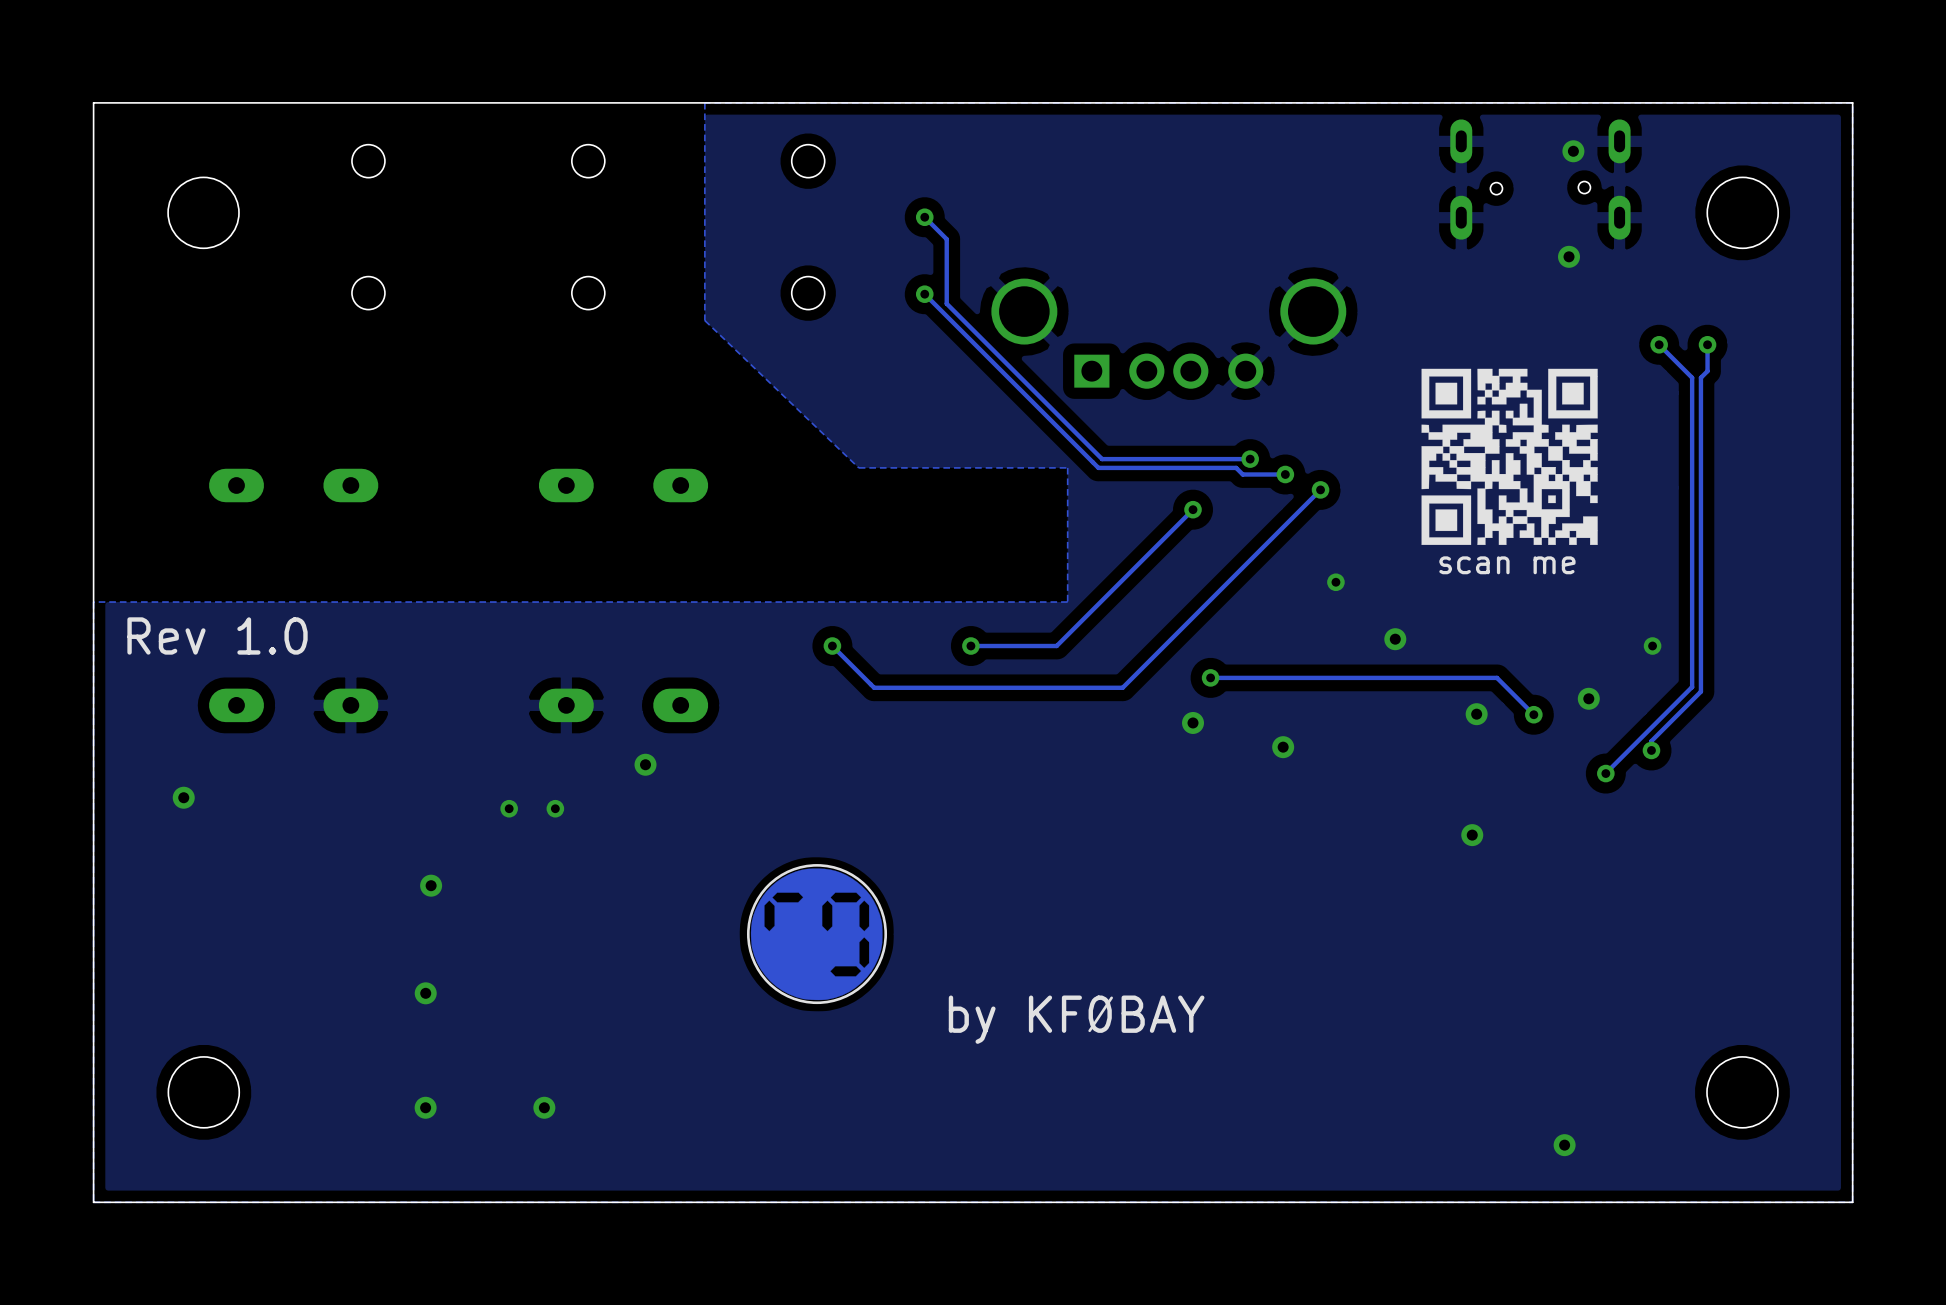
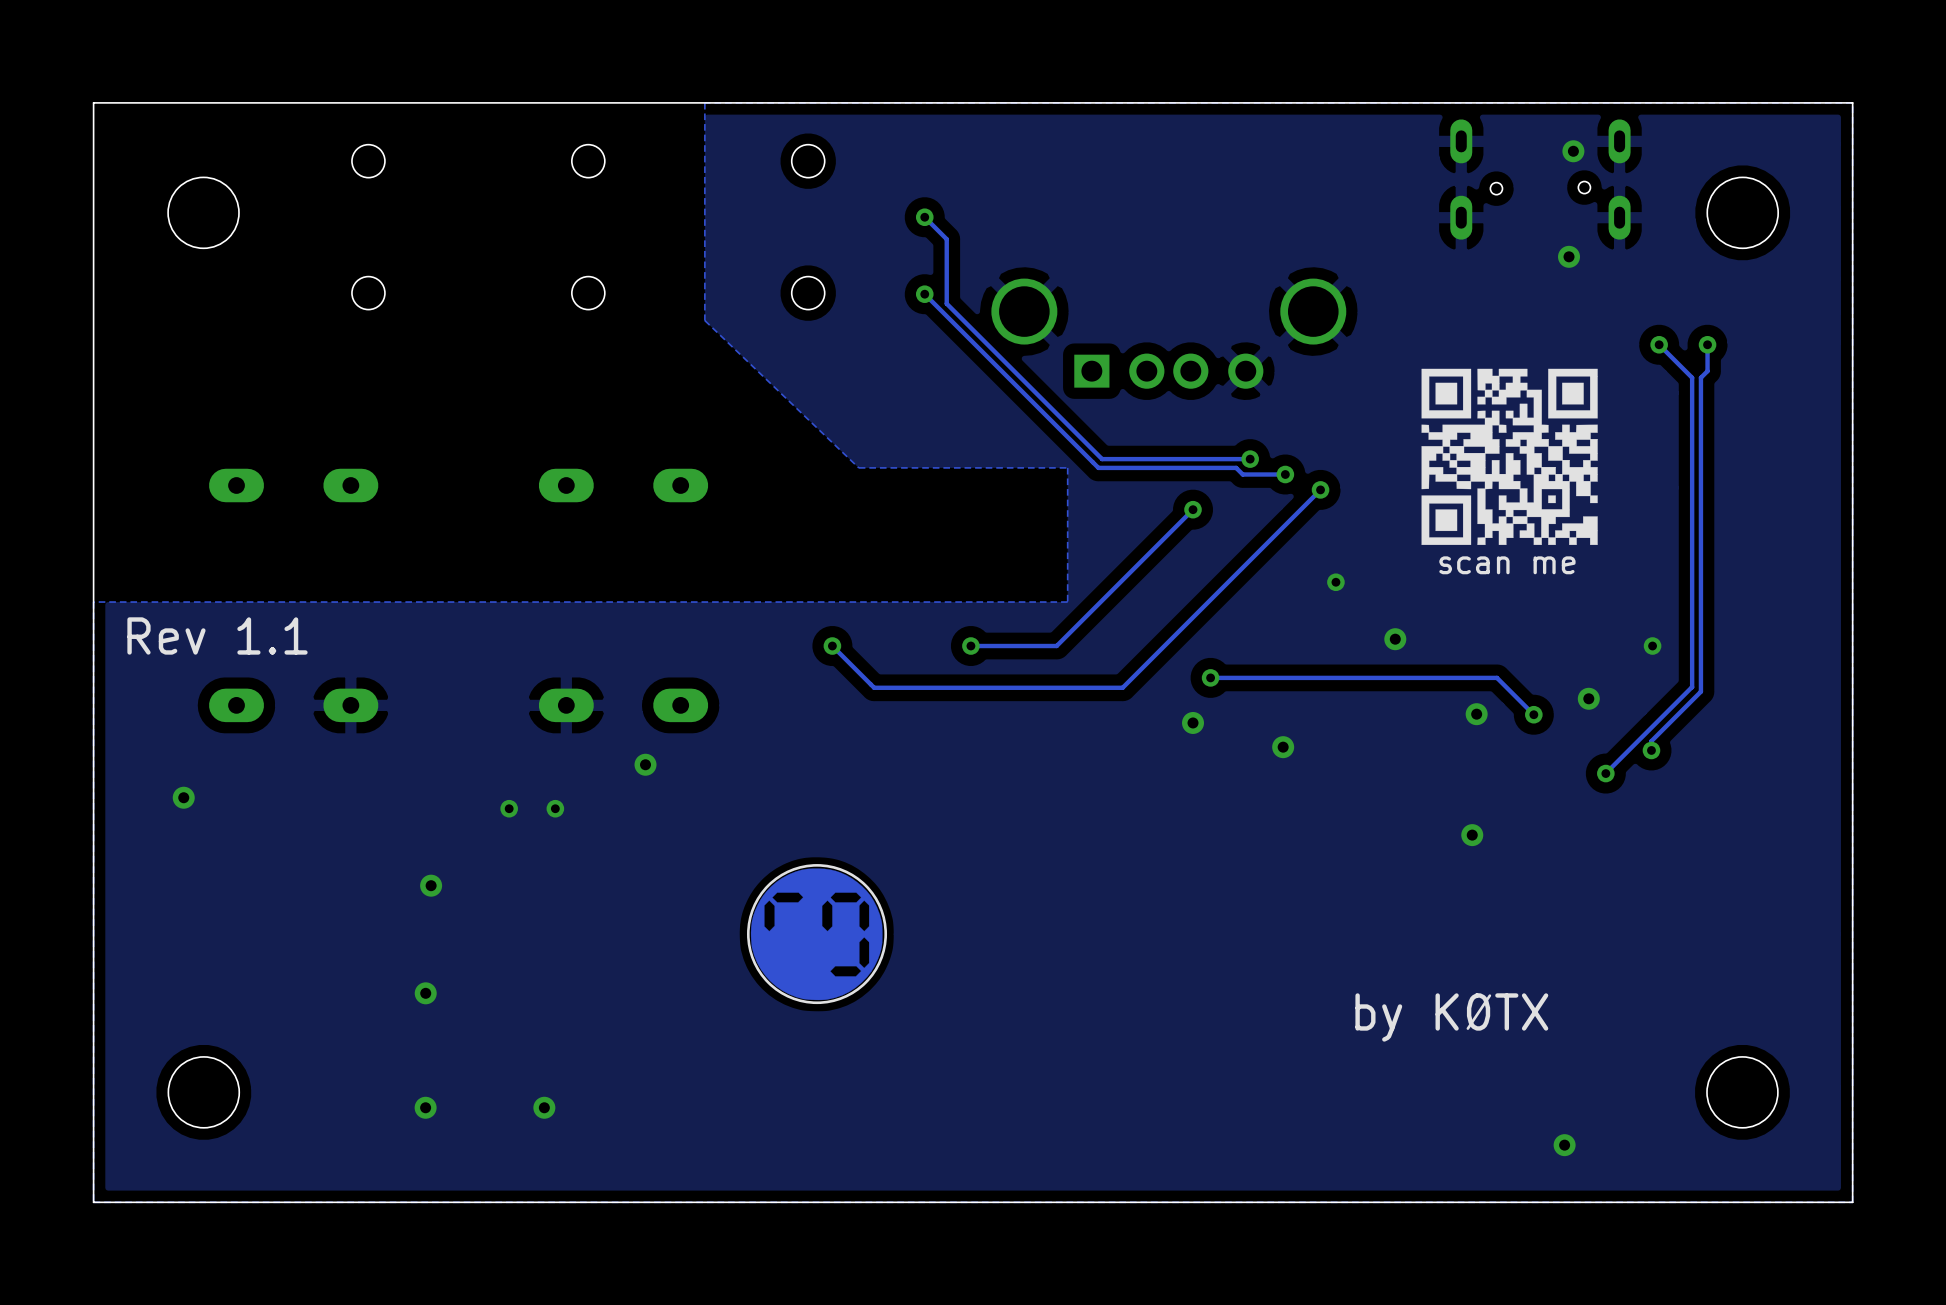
text: Rev 1.0 (217, 635) -> Rev 1.1 (217, 635)
line: (1111, 997) (1089, 1030) -> (1489, 995) (1467, 1028)
text: none -> by K0TX (1451, 1017)
text: by KF0BAY (1076, 1019) -> none

